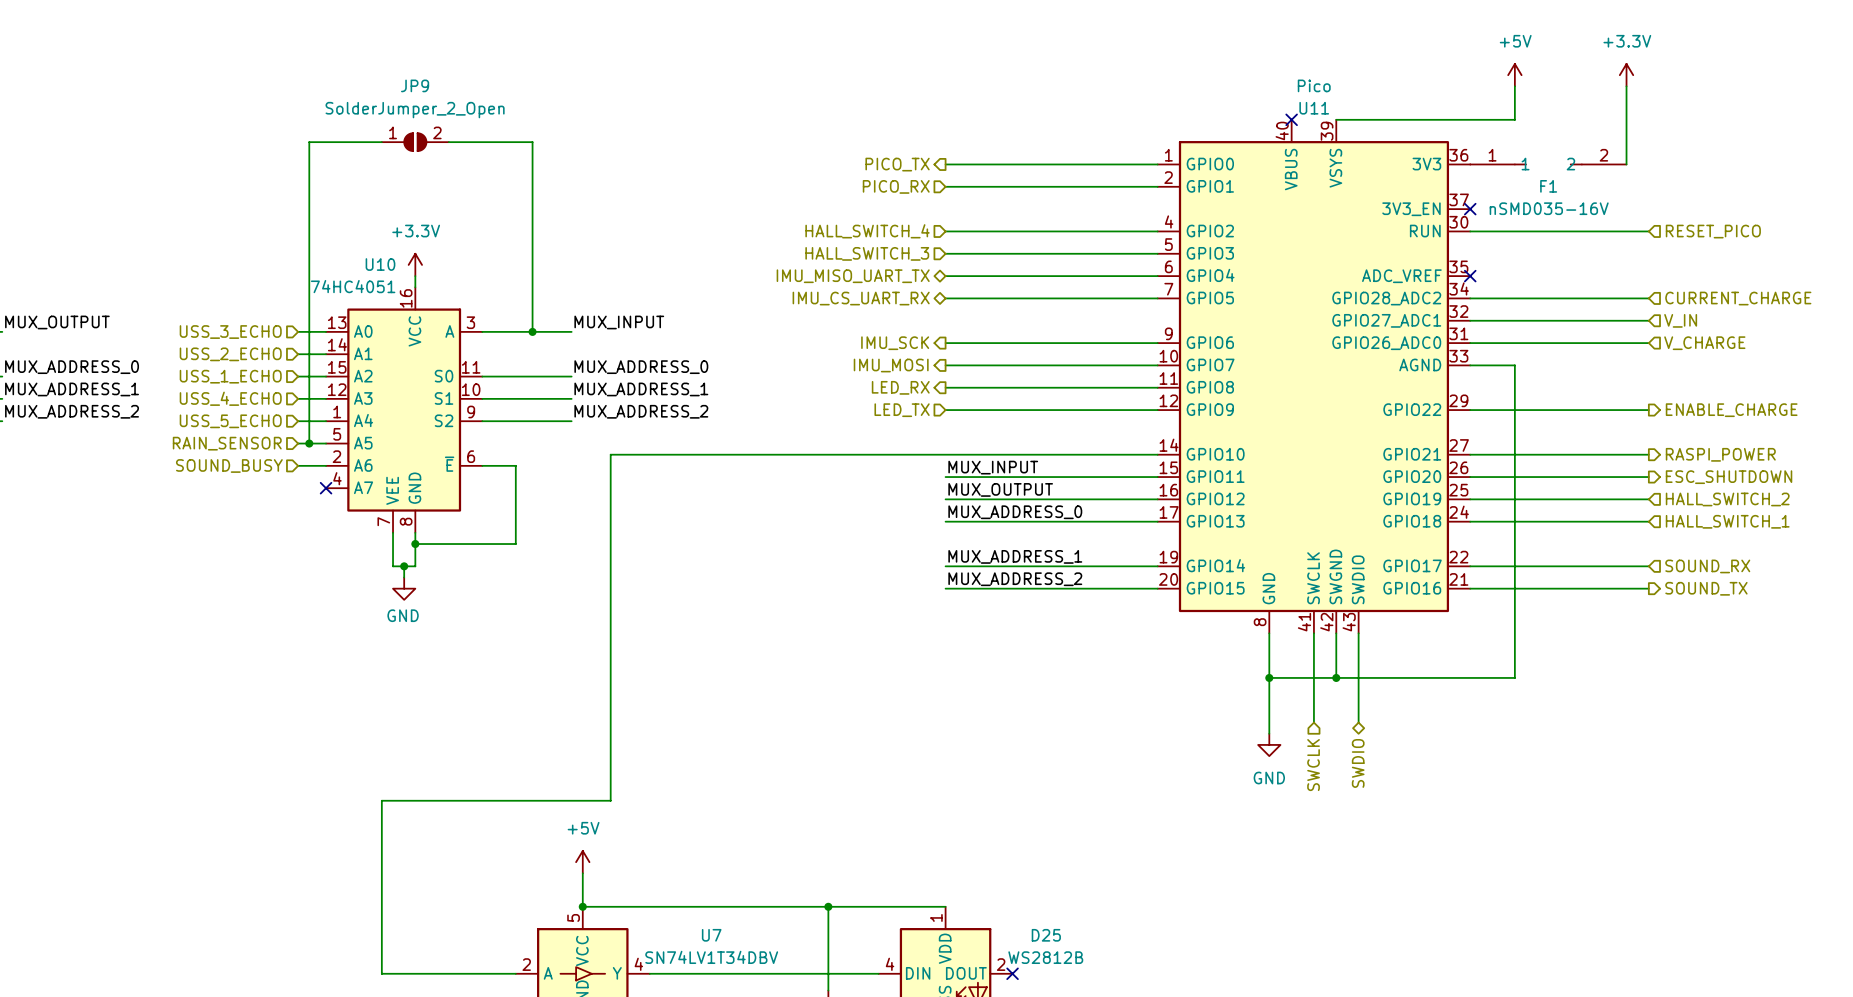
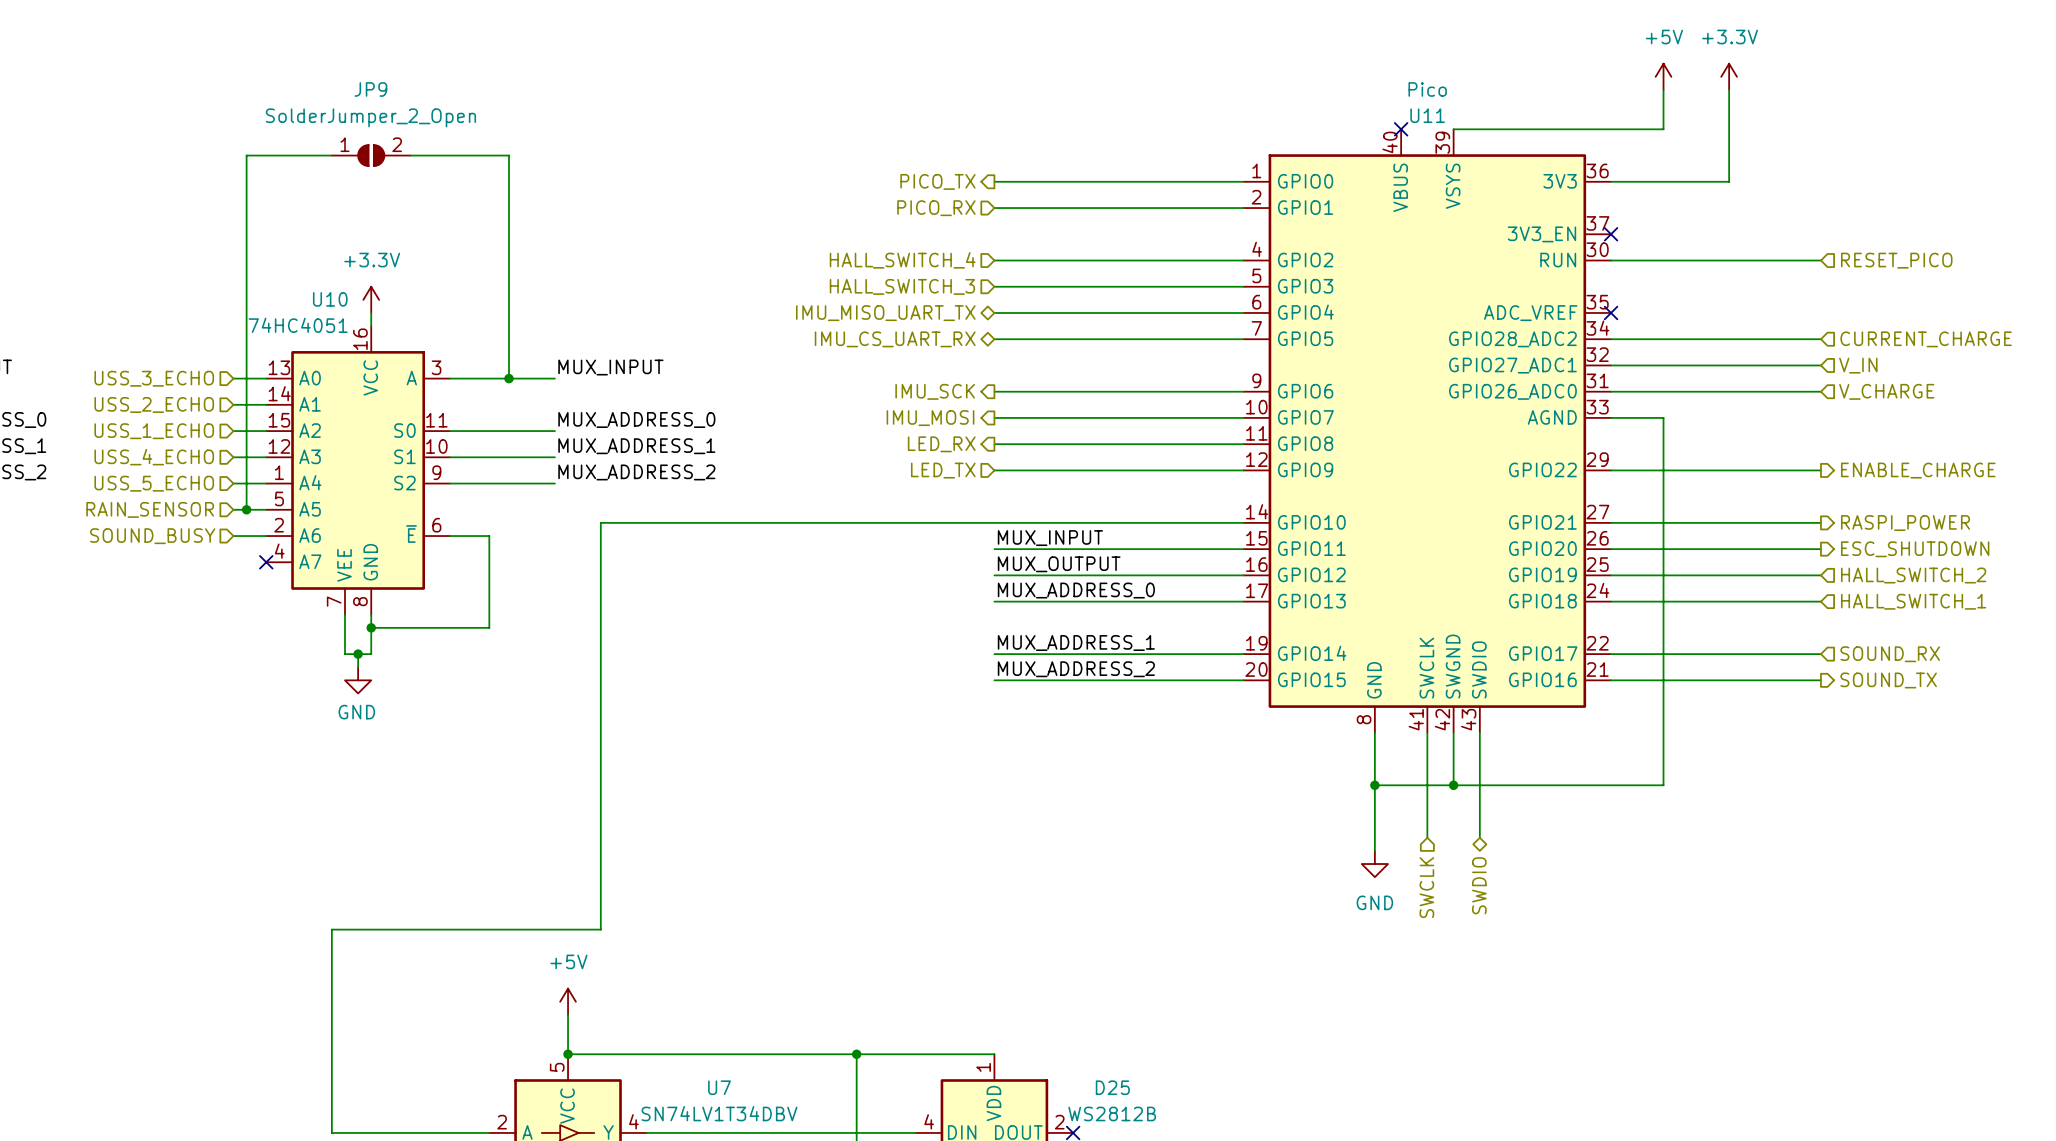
power symbol position: +3.3V (1626, 75) -> +3.3V (1729, 76)
wire: none -> (1729, 89) (1729, 181) (1611, 181)
wire: (1626, 86) (1626, 164) -> none
F1: nSMD035-16V (1548, 164) -> none

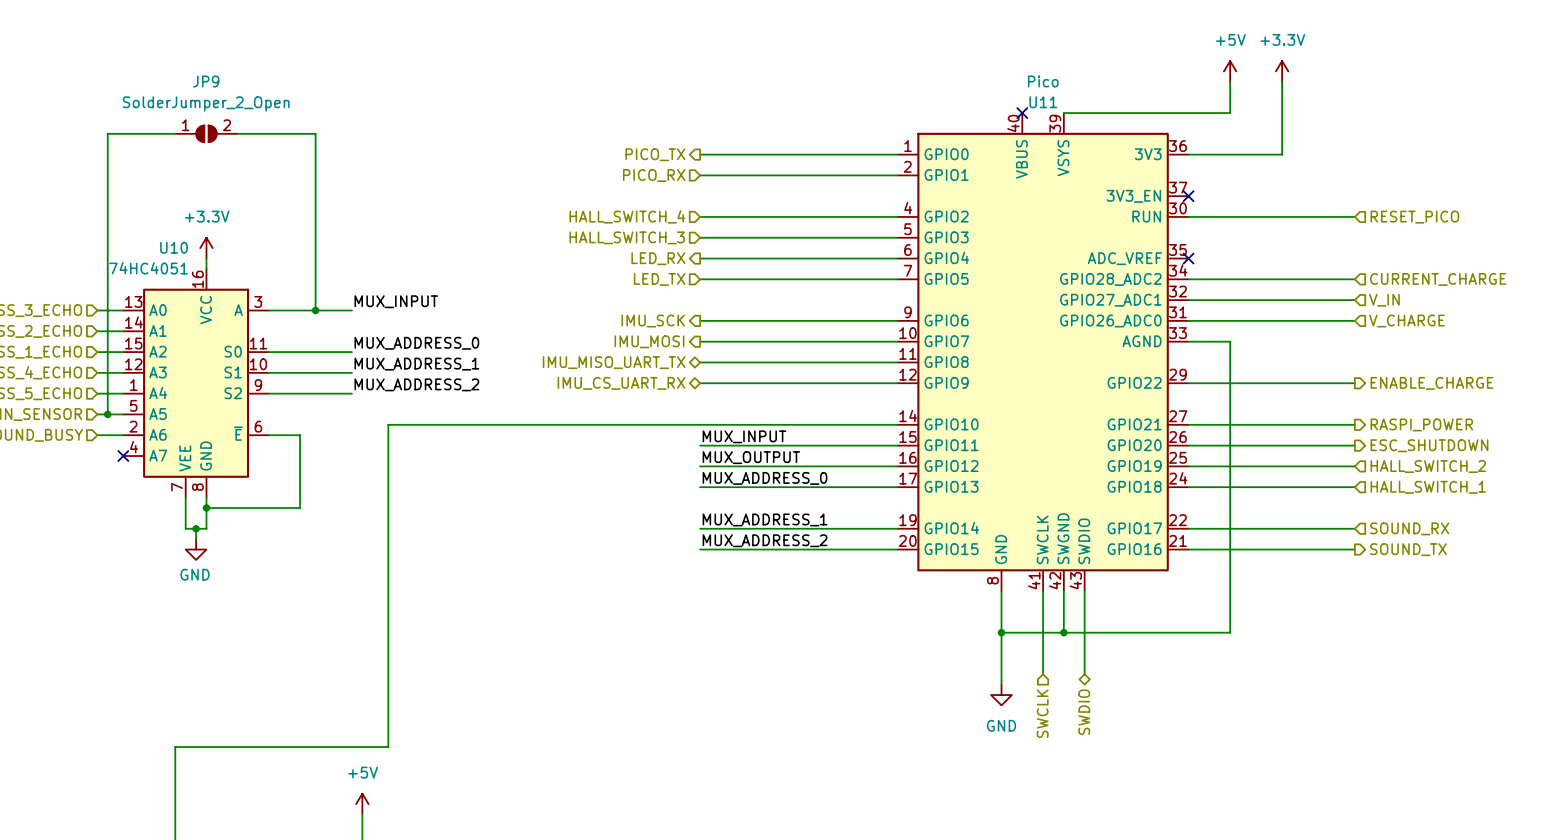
hierarchical label shape: bidirectional (885, 313) -> output (658, 258)
hierarchical label: IMU_MISO_UART_TX (885, 313) -> LED_RX (658, 258)
hierarchical label shape: bidirectional (895, 339) -> input (659, 279)
hierarchical label: IMU_CS_UART_RX (895, 339) -> LED_TX (659, 279)
hierarchical label shape: output (941, 444) -> bidirectional (614, 362)
hierarchical label: LED_RX (941, 444) -> IMU_MISO_UART_TX (614, 362)
hierarchical label shape: input (943, 470) -> bidirectional (621, 383)
hierarchical label: LED_TX (943, 470) -> IMU_CS_UART_RX (621, 383)

